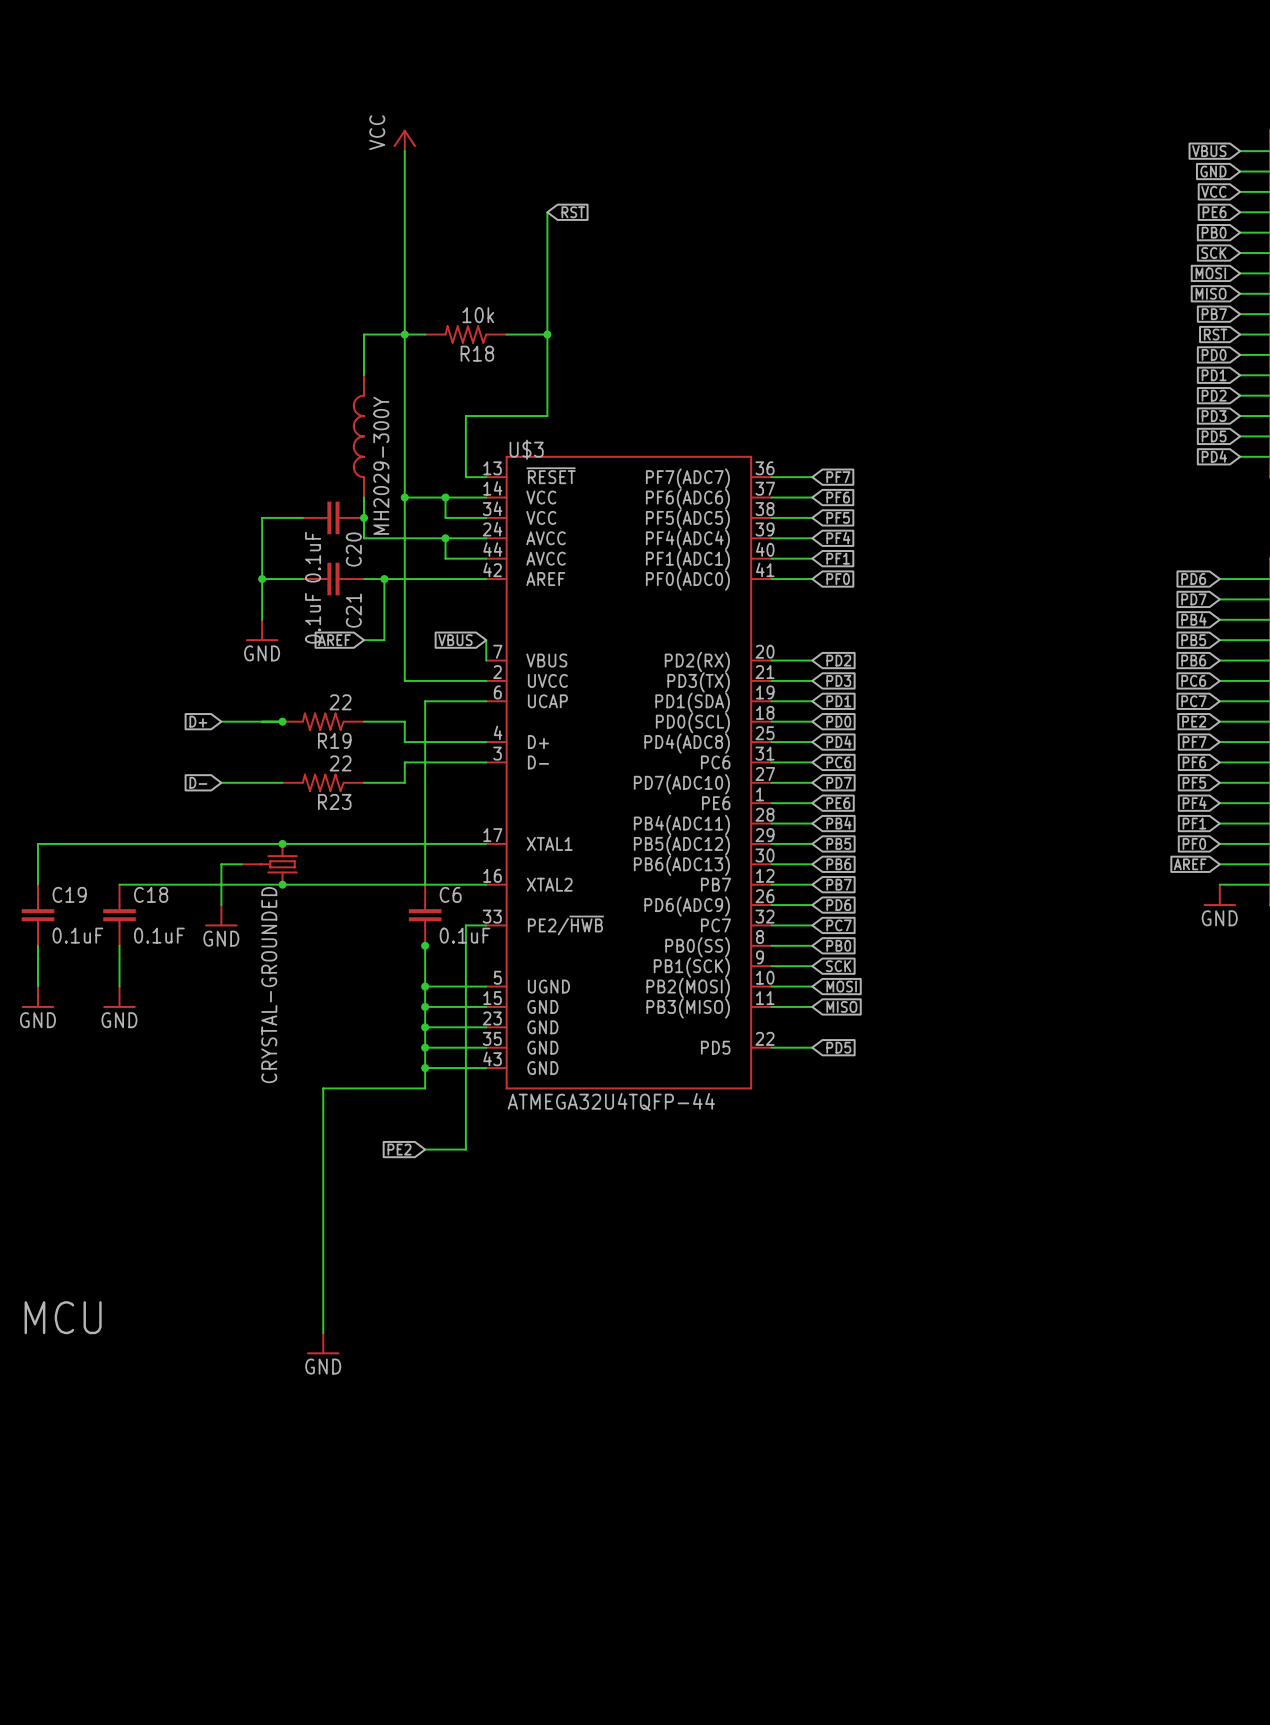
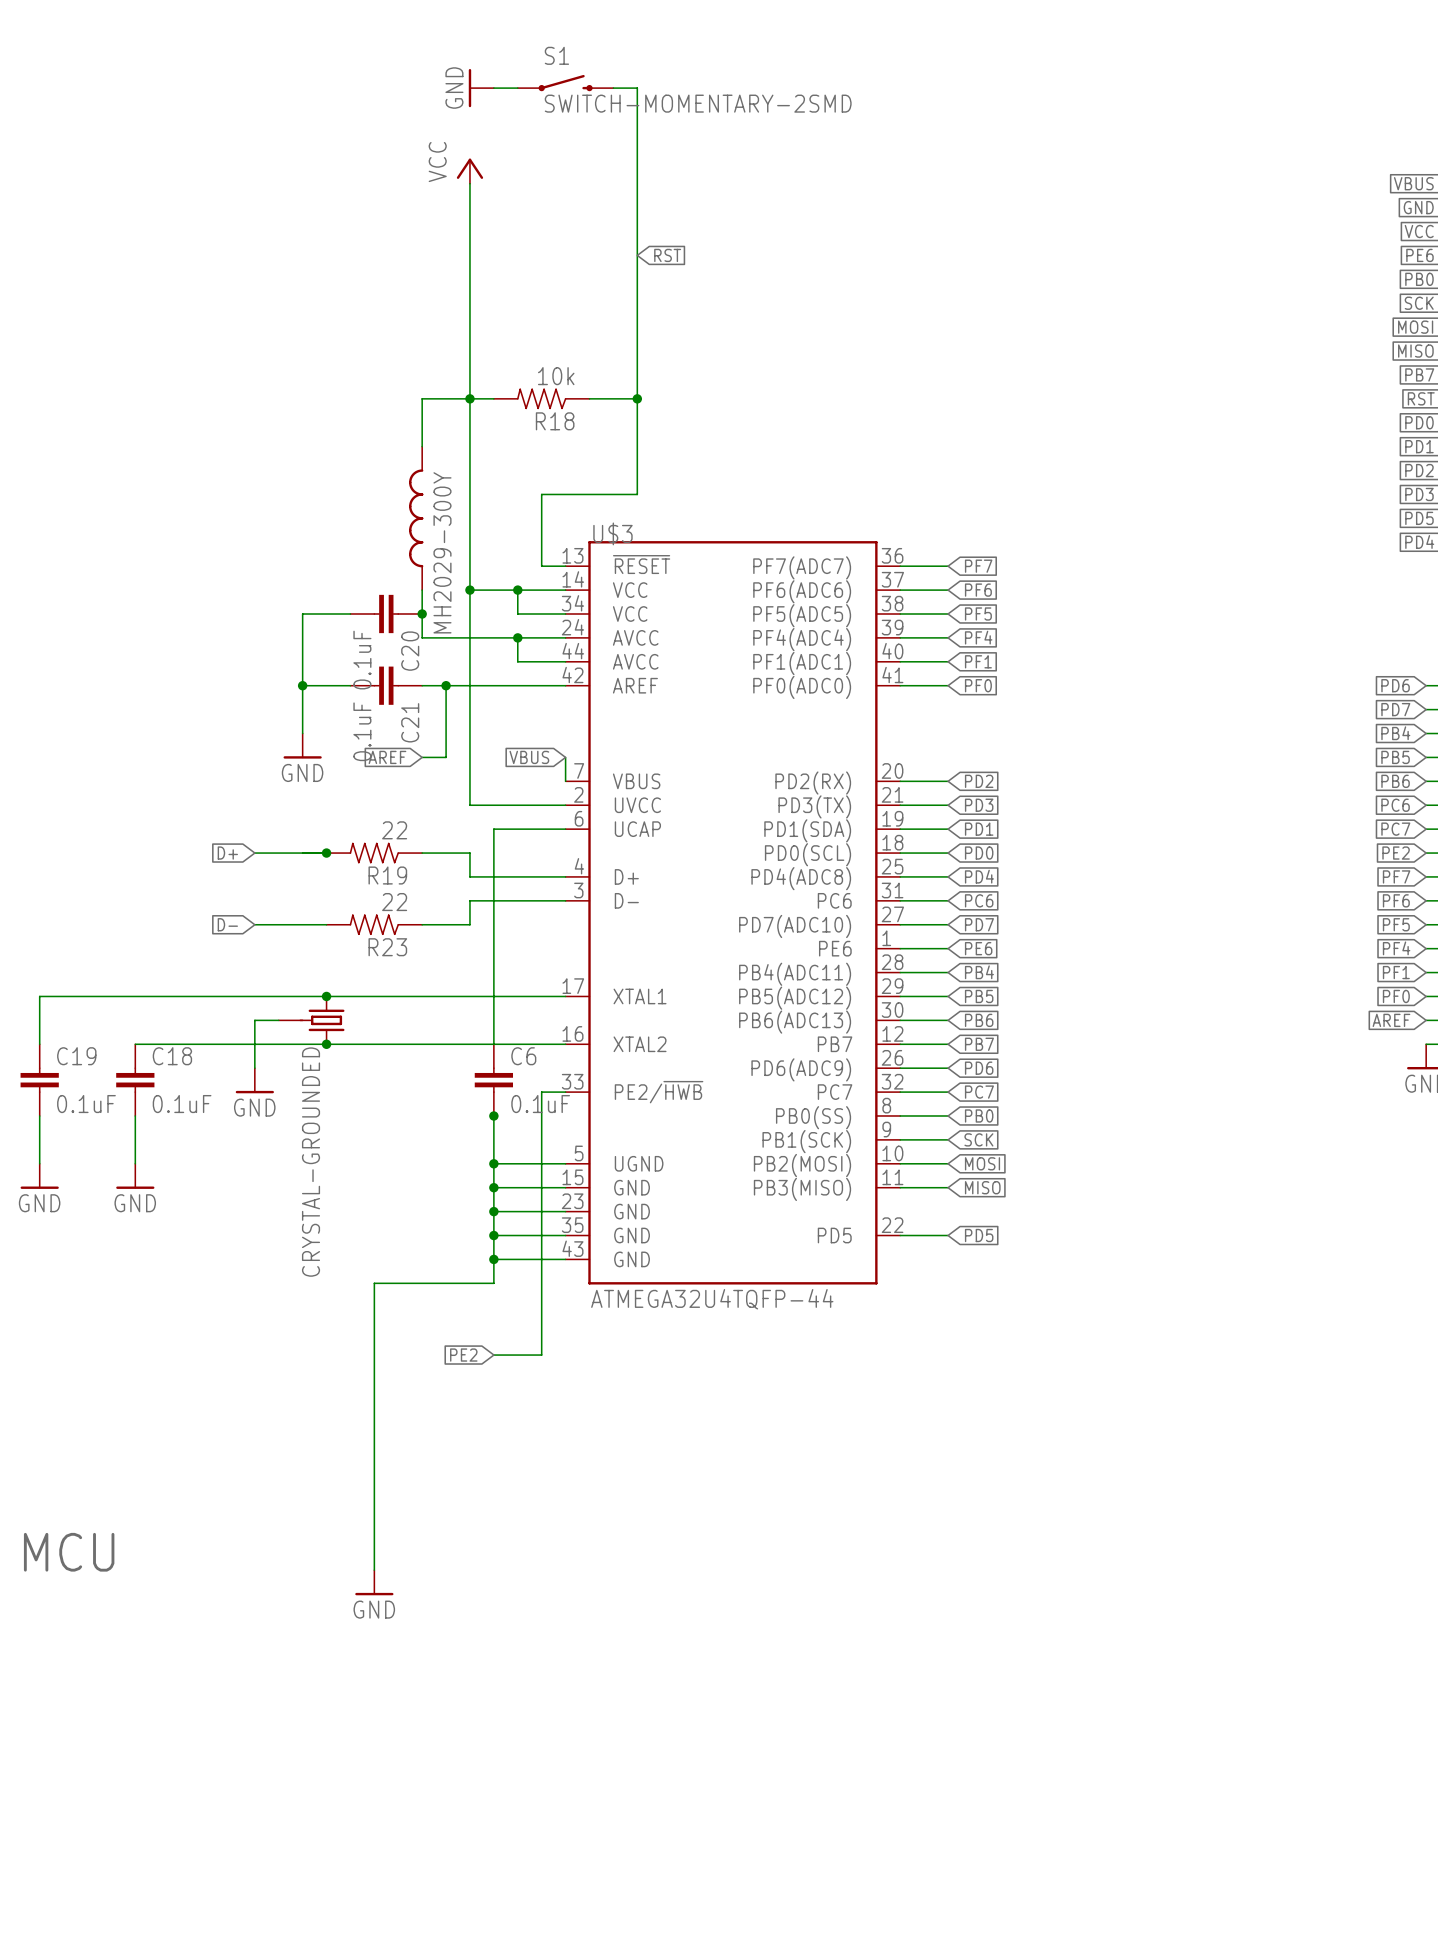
S1: none -> SWITCH-MOMENTARY-2SMD (565, 83)
power symbol: none -> GND (481, 88)
wire: none -> (493, 88) (517, 88)
wire: none -> (613, 88) (637, 88) (637, 255)

